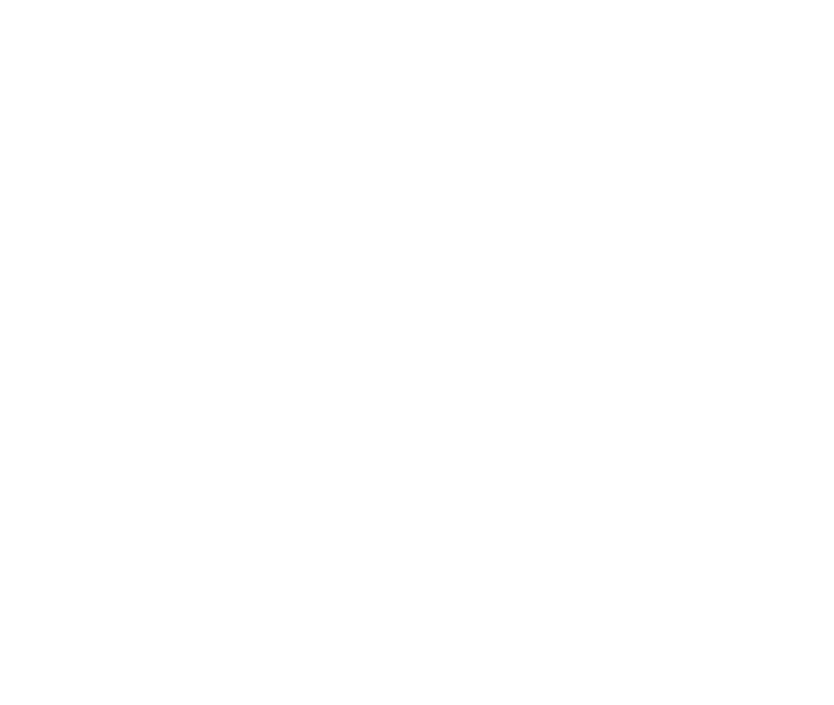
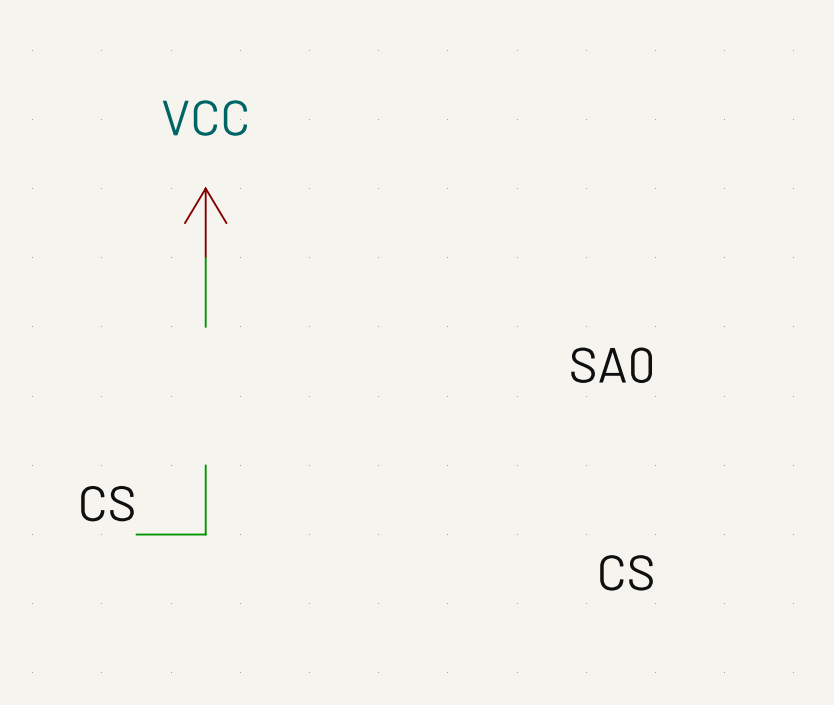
power symbol: none -> VCC (205, 223)
wire: none -> (205, 257) (205, 326)
label: none -> SA0 (611, 365)
wire: none -> (205, 465) (205, 534) (136, 534)
label: none -> CS (107, 503)
label: none -> CS (626, 572)

